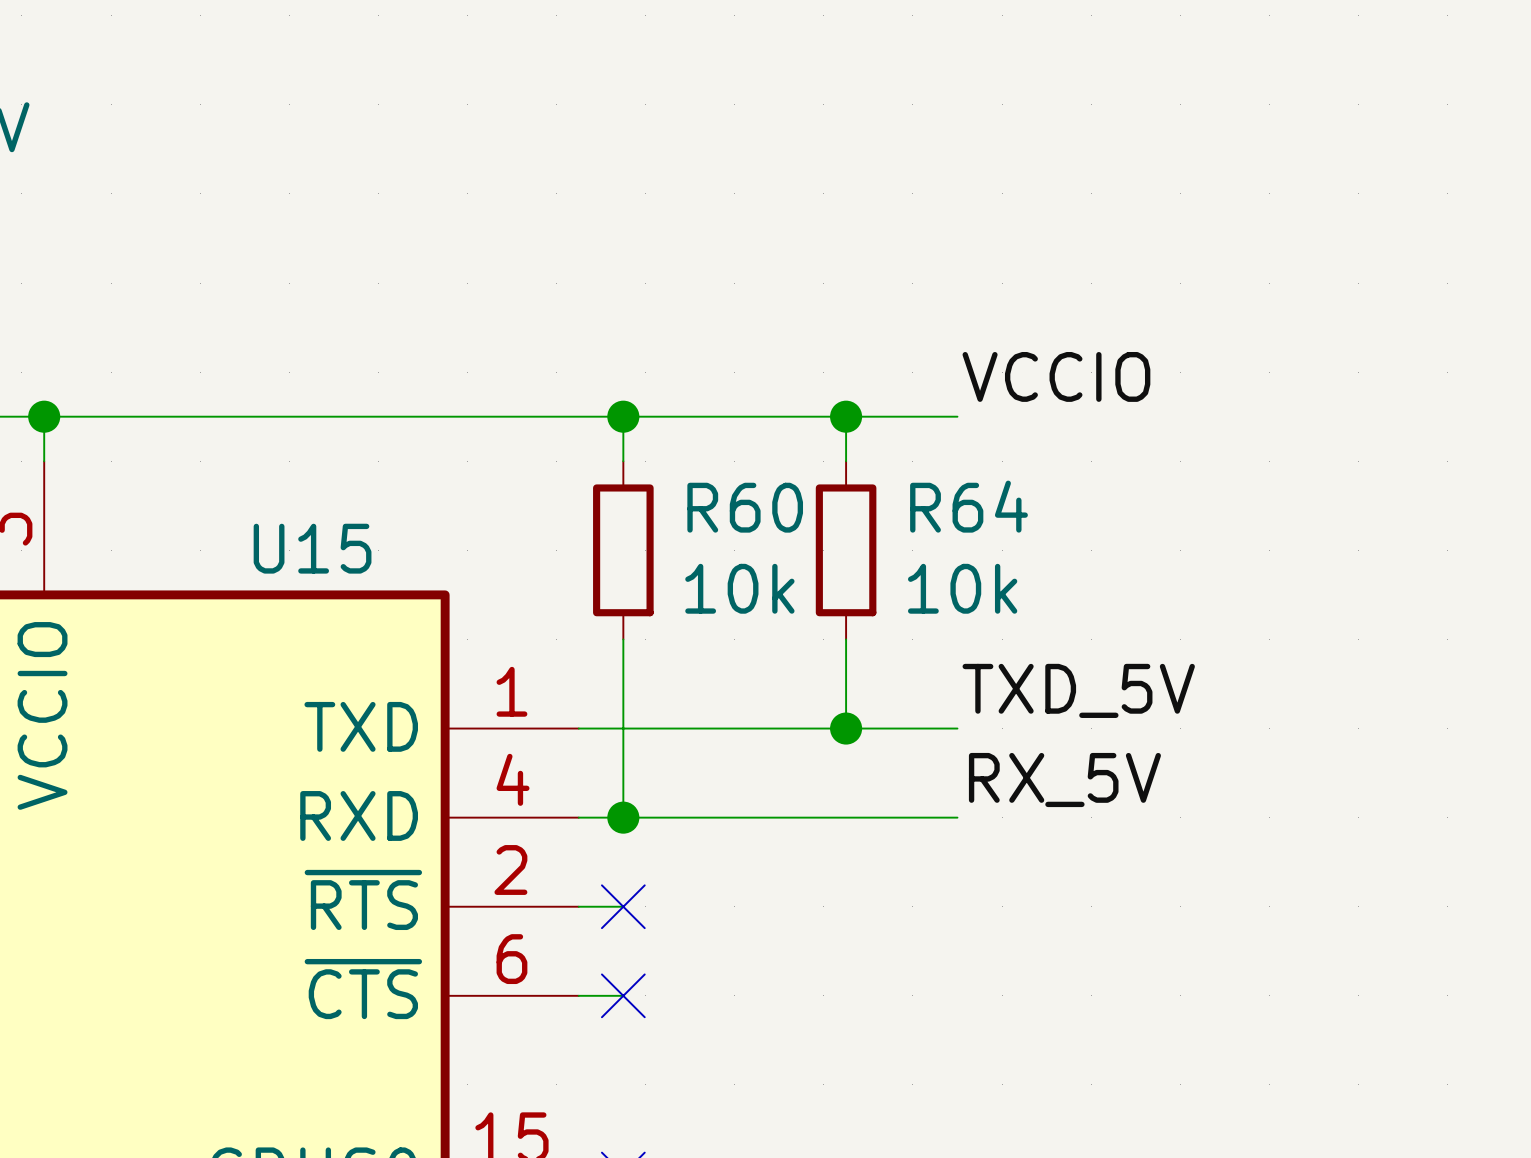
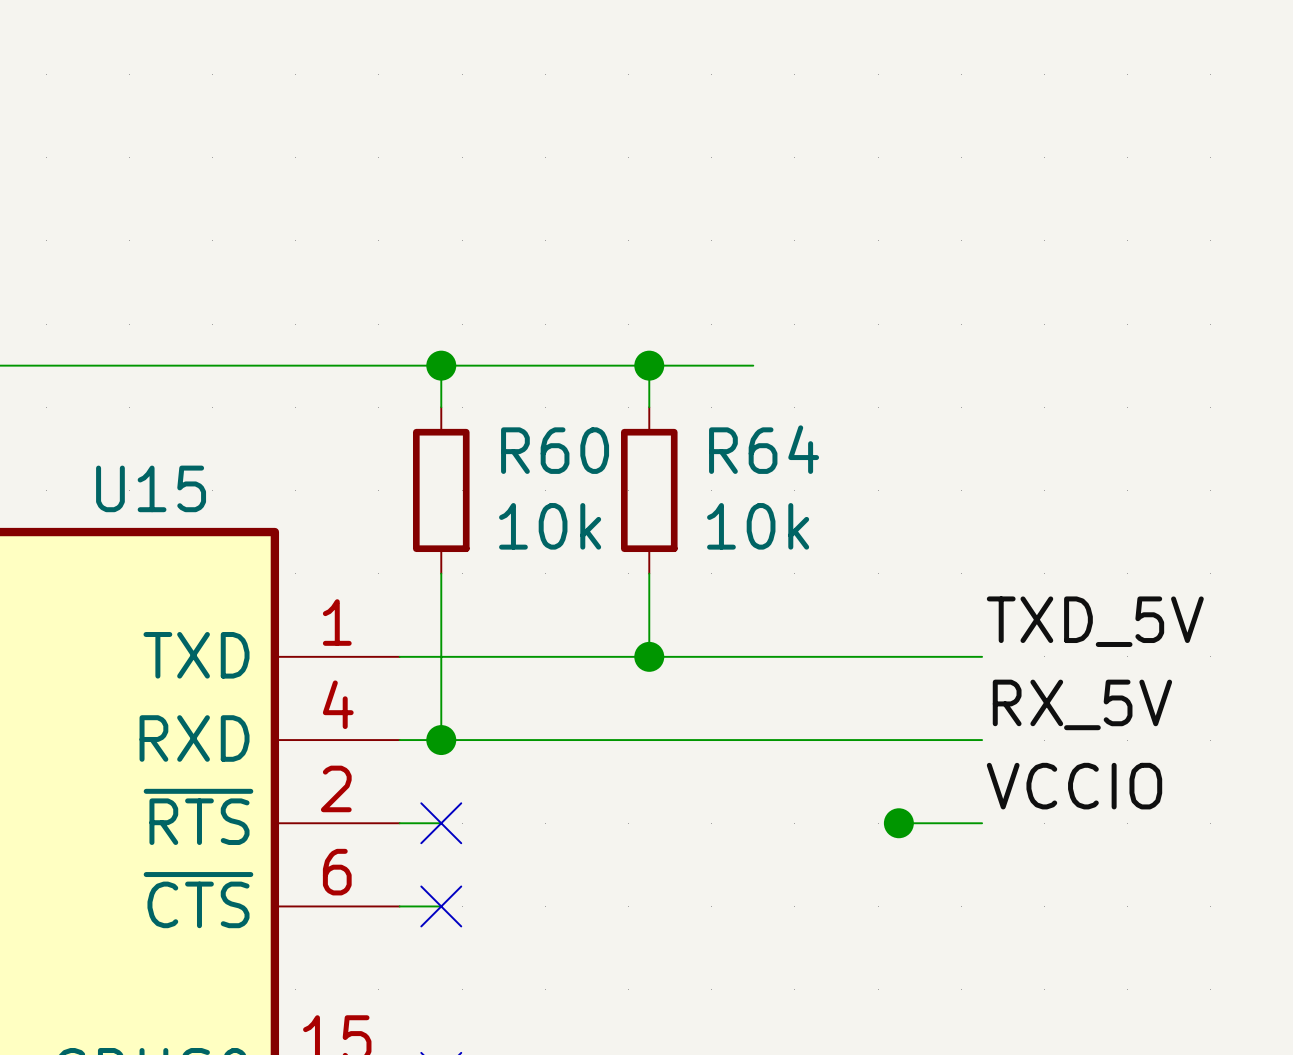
label position: VCCIO (1056, 376) -> VCCIO (1074, 786)
label position: TXD_5V (1078, 690) -> TXD_5V (1095, 621)
wire: none -> (753, 656) (982, 656)
label position: RX_5V (1064, 780) -> RX_5V (1082, 704)
wire: none -> (753, 740) (982, 740)
wire: none -> (898, 823) (982, 823)
junction: none -> (898, 823)

